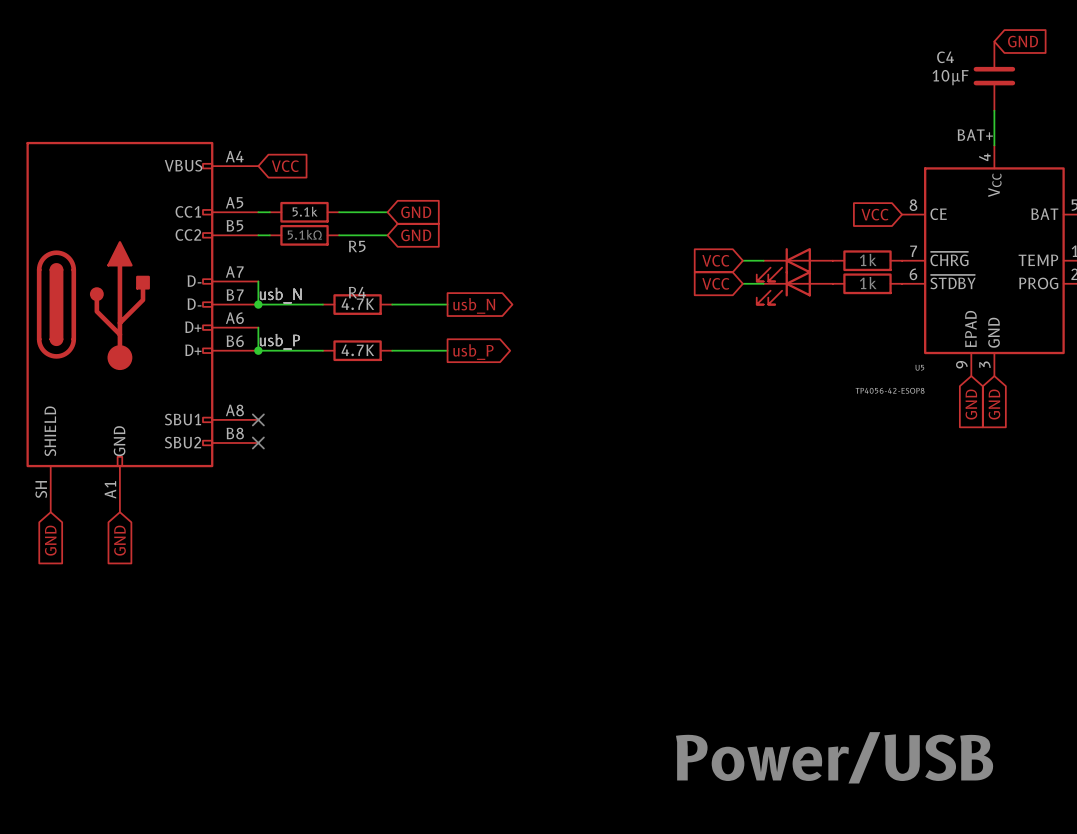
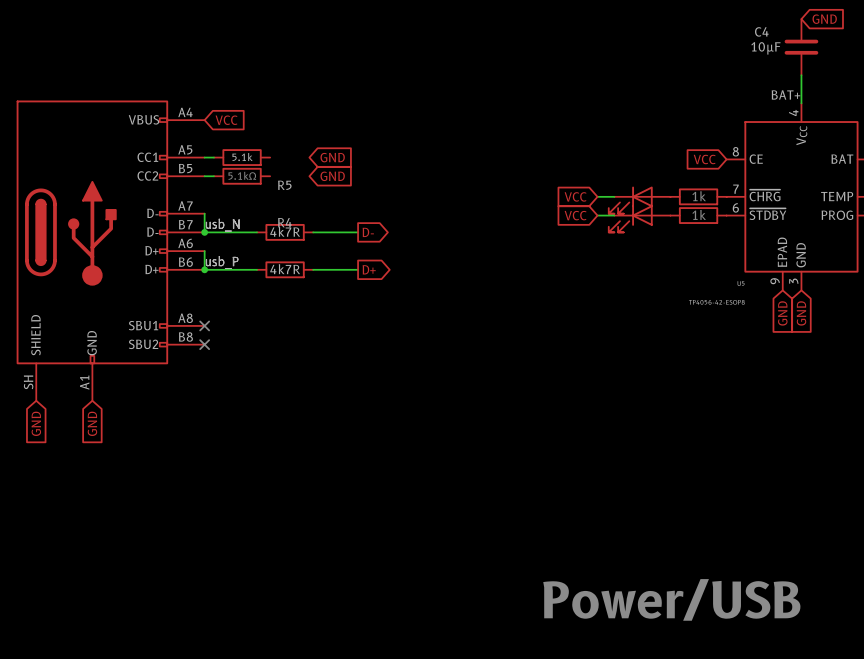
wire: (339, 212) (387, 212) -> none
wire: (339, 235) (387, 235) -> none
R5 value: 4.7K (357, 304) -> 4k7R (285, 231)
global label: usb_N (474, 305) -> D- (368, 232)
R4 value: 4.7K (357, 350) -> 4k7R (285, 269)
global label: usb_P (473, 352) -> D+ (369, 269)

